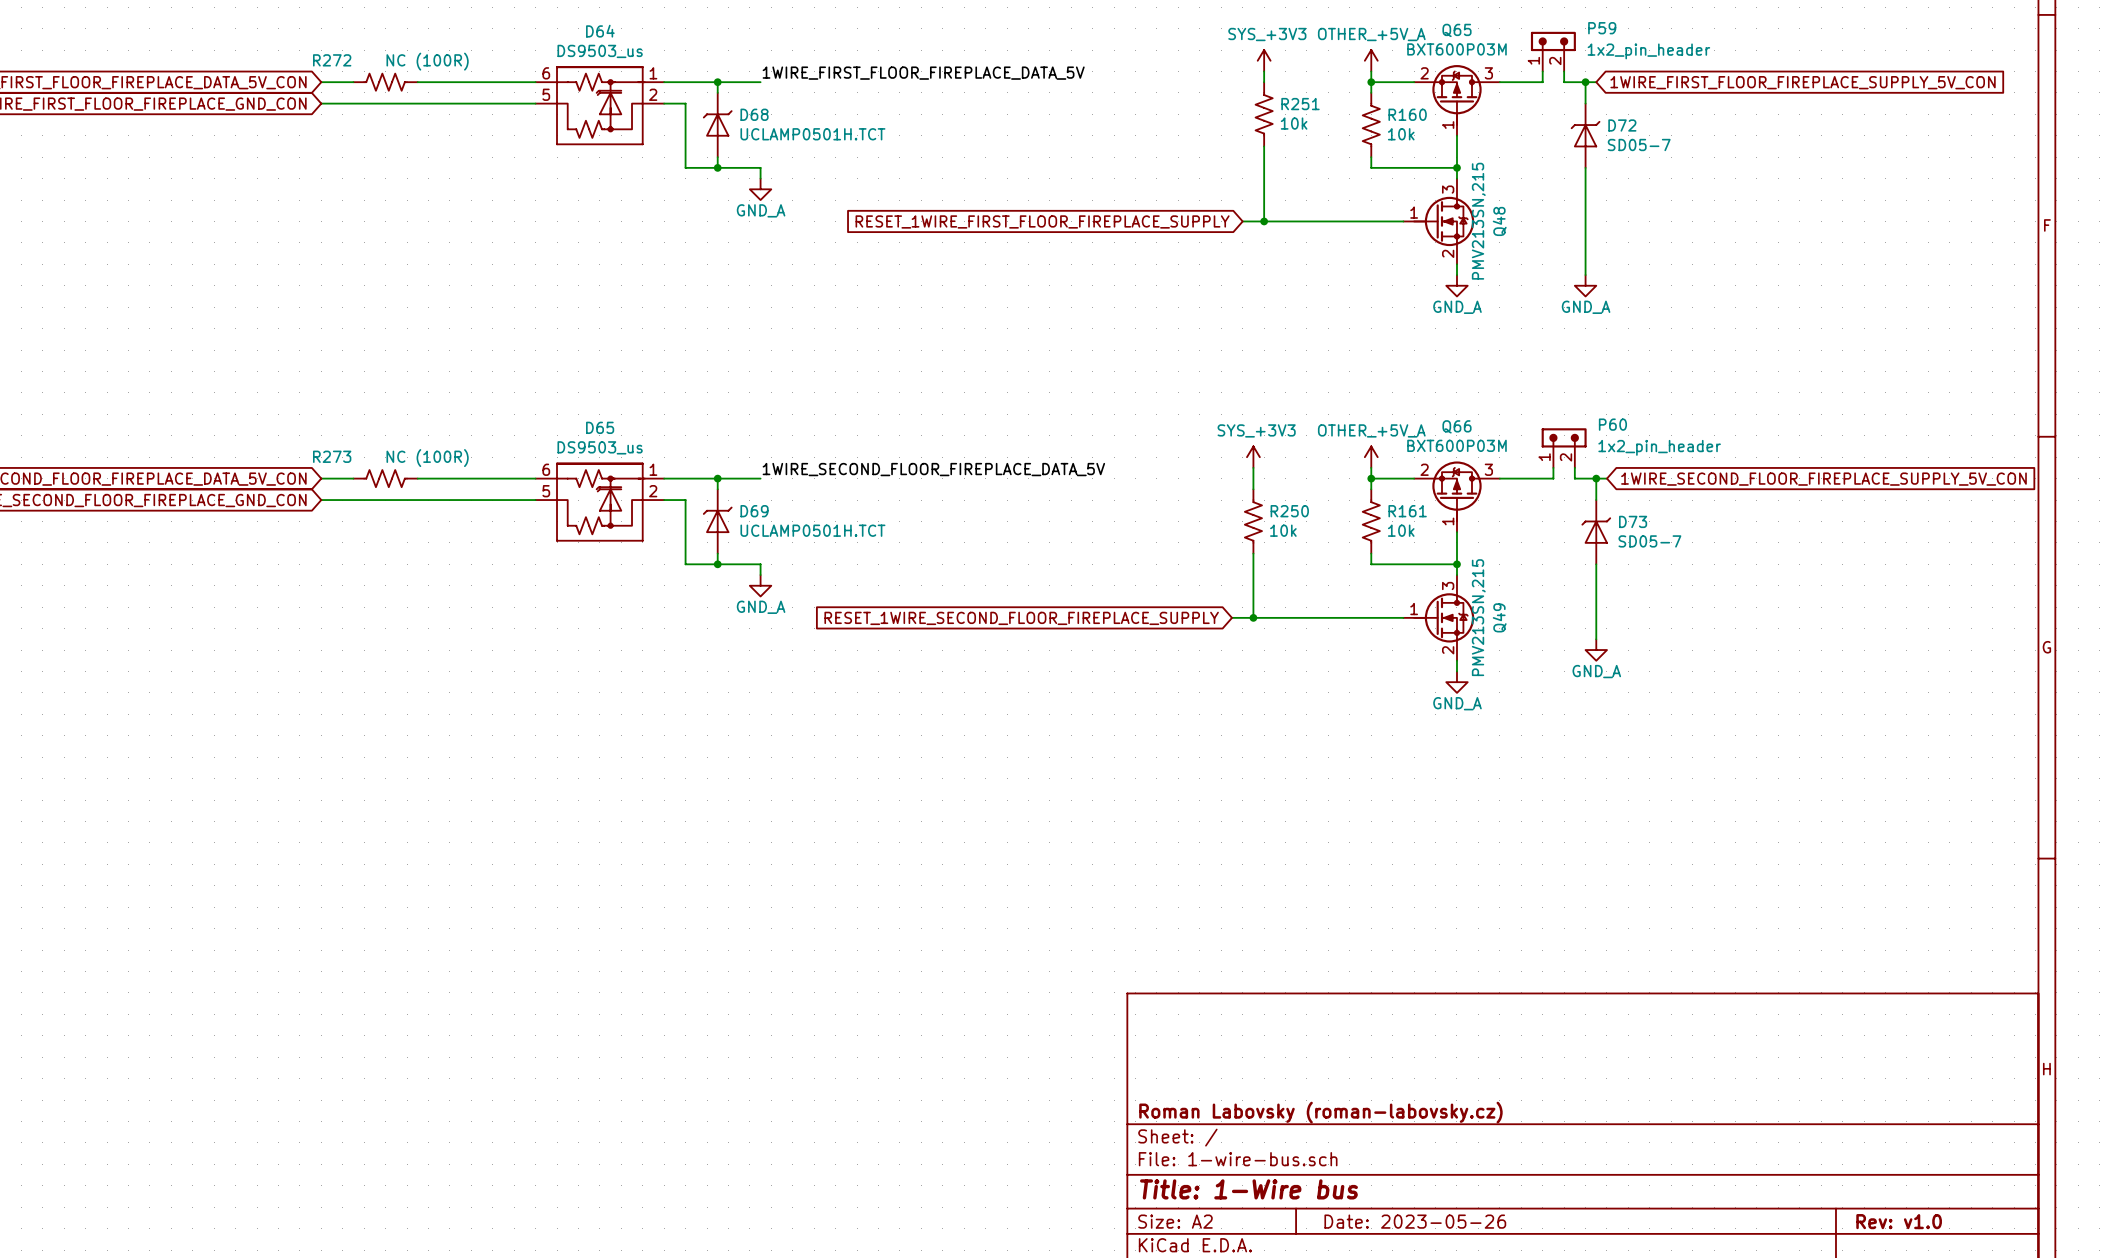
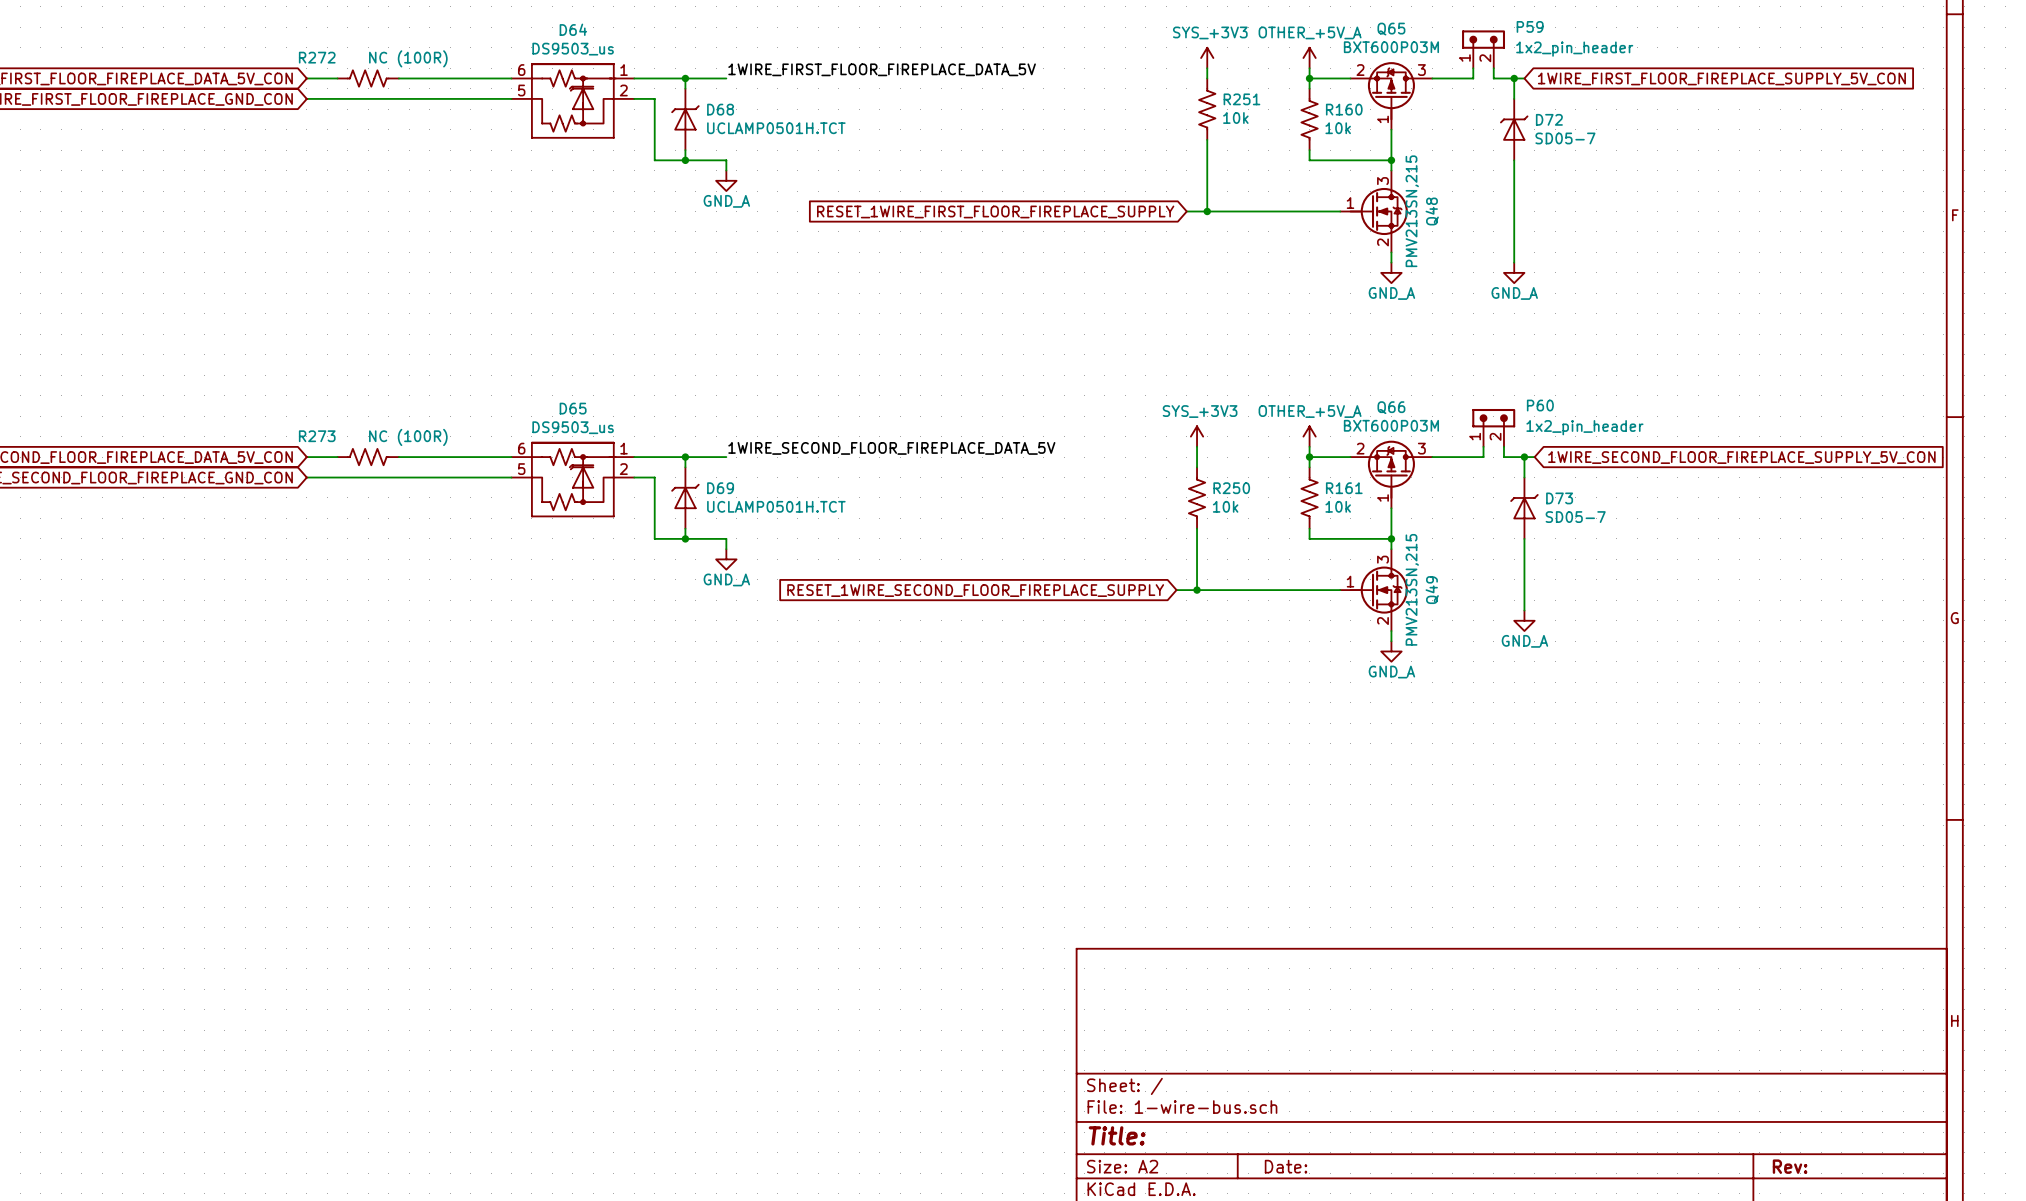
title block: Roman Labovsky (roman-labovsky.cz) (1320, 1112) -> none
title block: Title: 1-Wire bus (1248, 1189) -> Title: (1117, 1135)
title block: Date: 2023-05-26 (1415, 1221) -> Date: (1286, 1166)
title block: Rev: v1.0 (1899, 1221) -> Rev: (1790, 1166)

